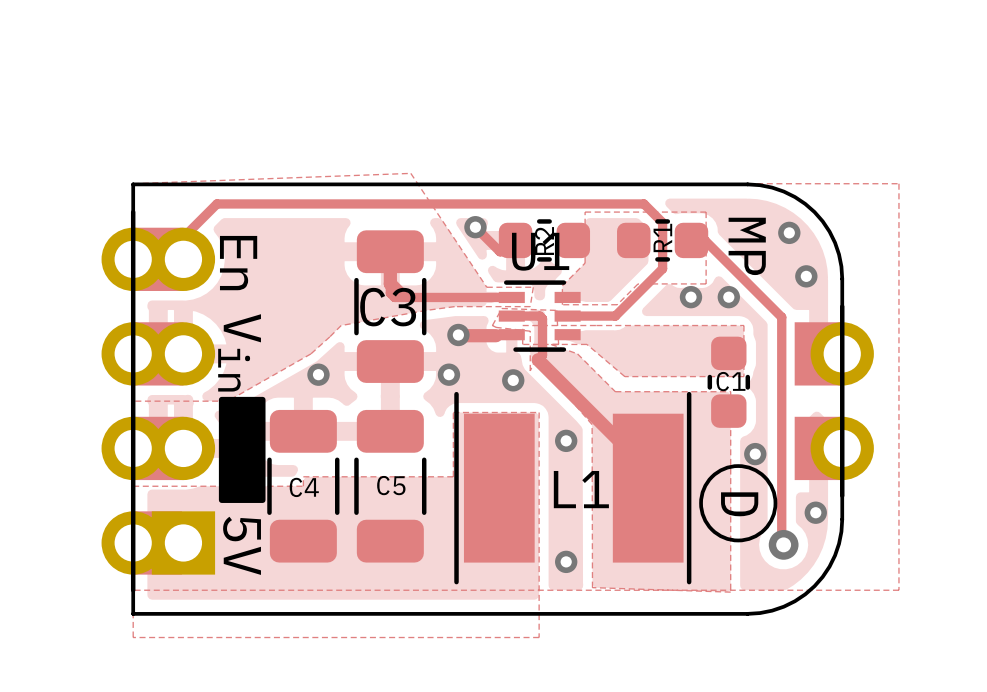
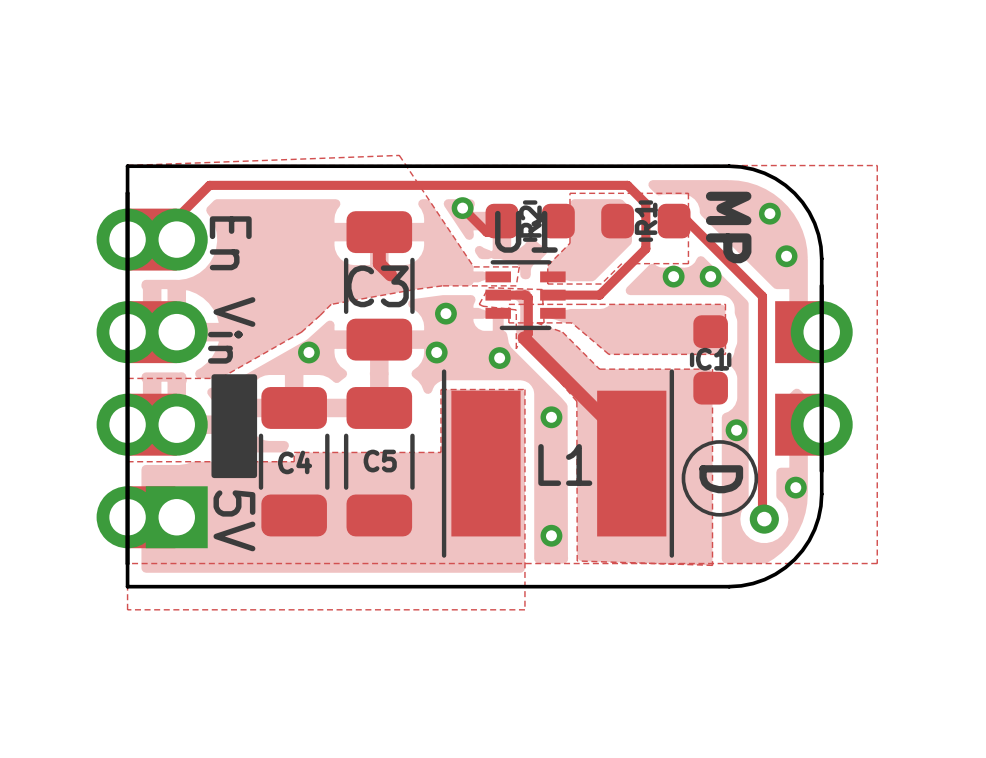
track: (390, 251) (390, 293) (394, 297) (511, 297) -> none
track: (458, 334) (496, 335) -> none

